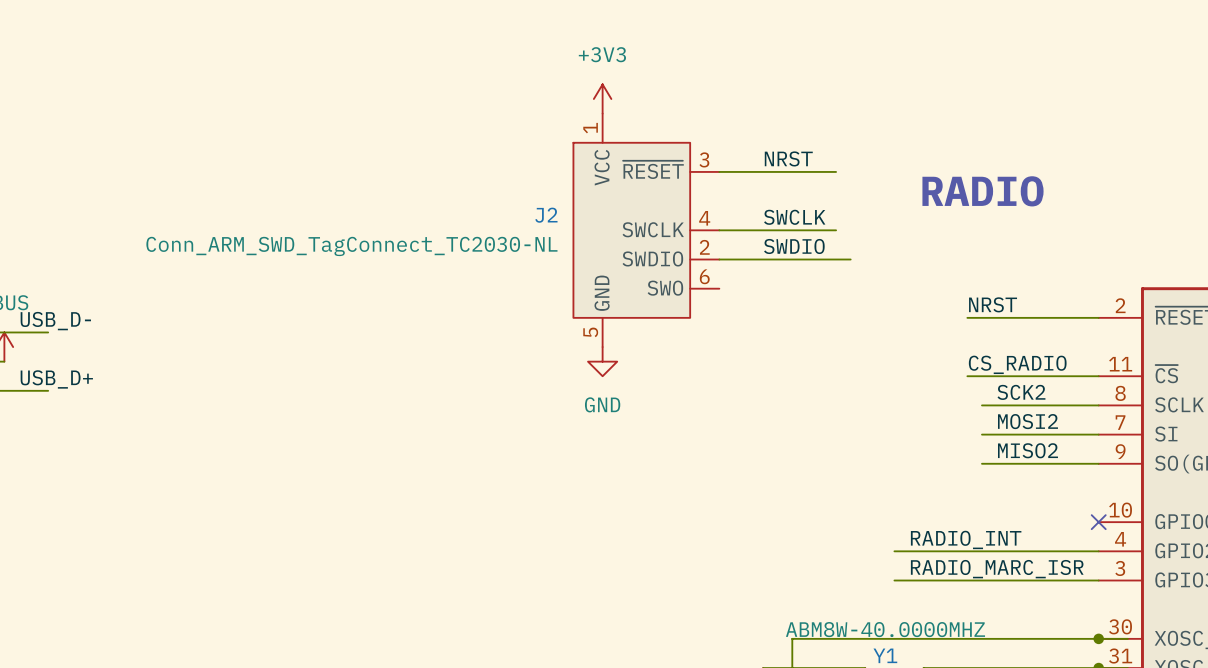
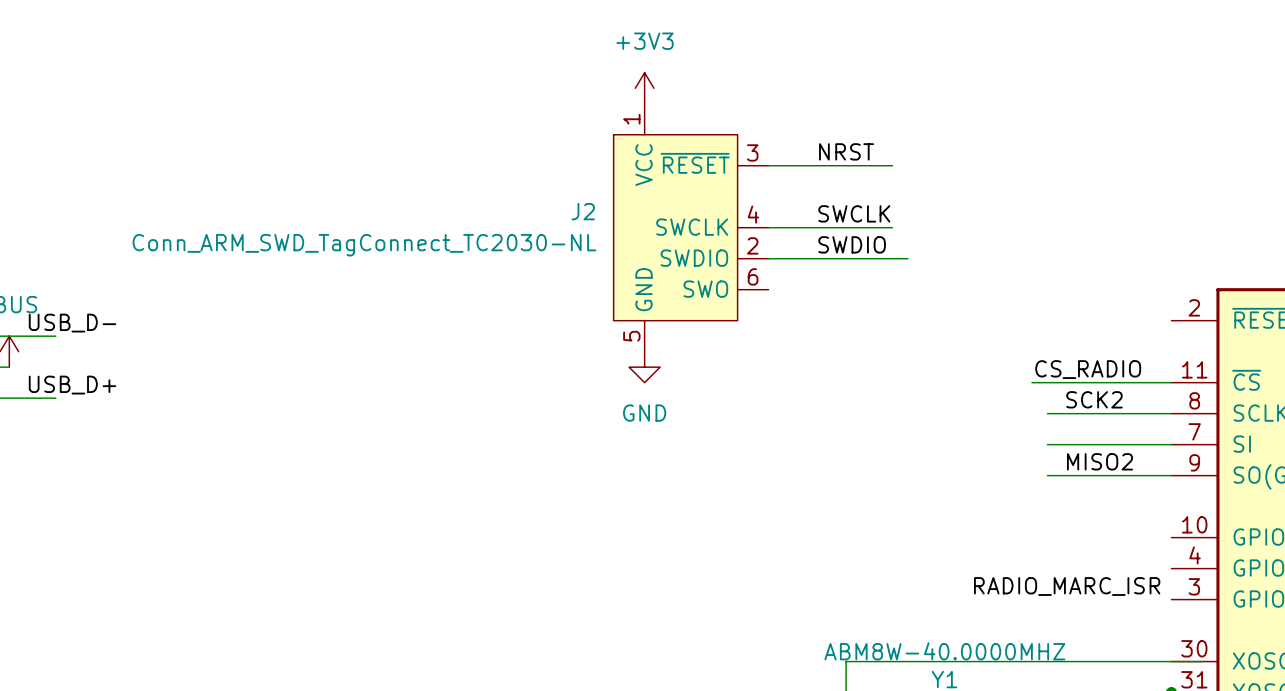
text: RADIO (983, 191) -> none
label: NRST (993, 304) -> none
wire: (967, 317) (1098, 317) -> none
label: MOSI2 (1027, 421) -> none
no-connect mark: (1098, 522) -> none
label: RADIO_INT (966, 539) -> none
wire: (894, 551) (1098, 551) -> none
wire: (894, 580) (1098, 580) -> none
junction: (1098, 638) -> none

